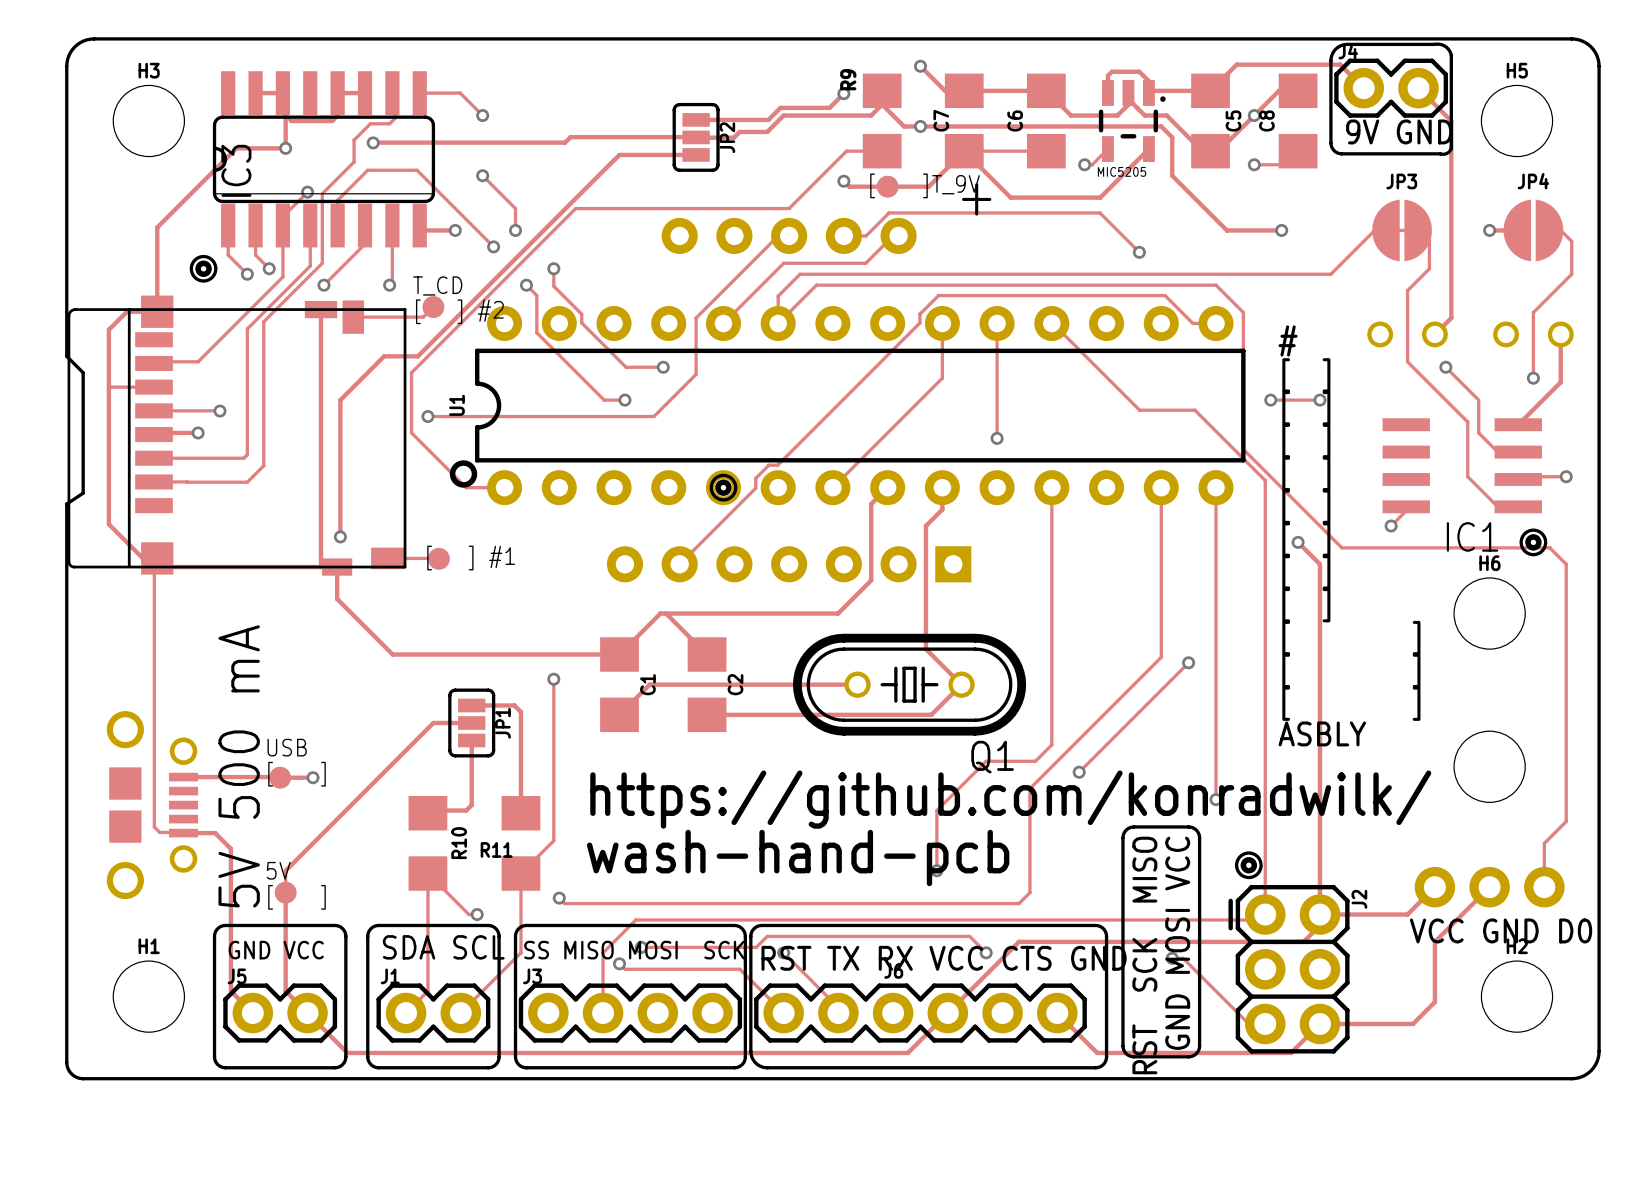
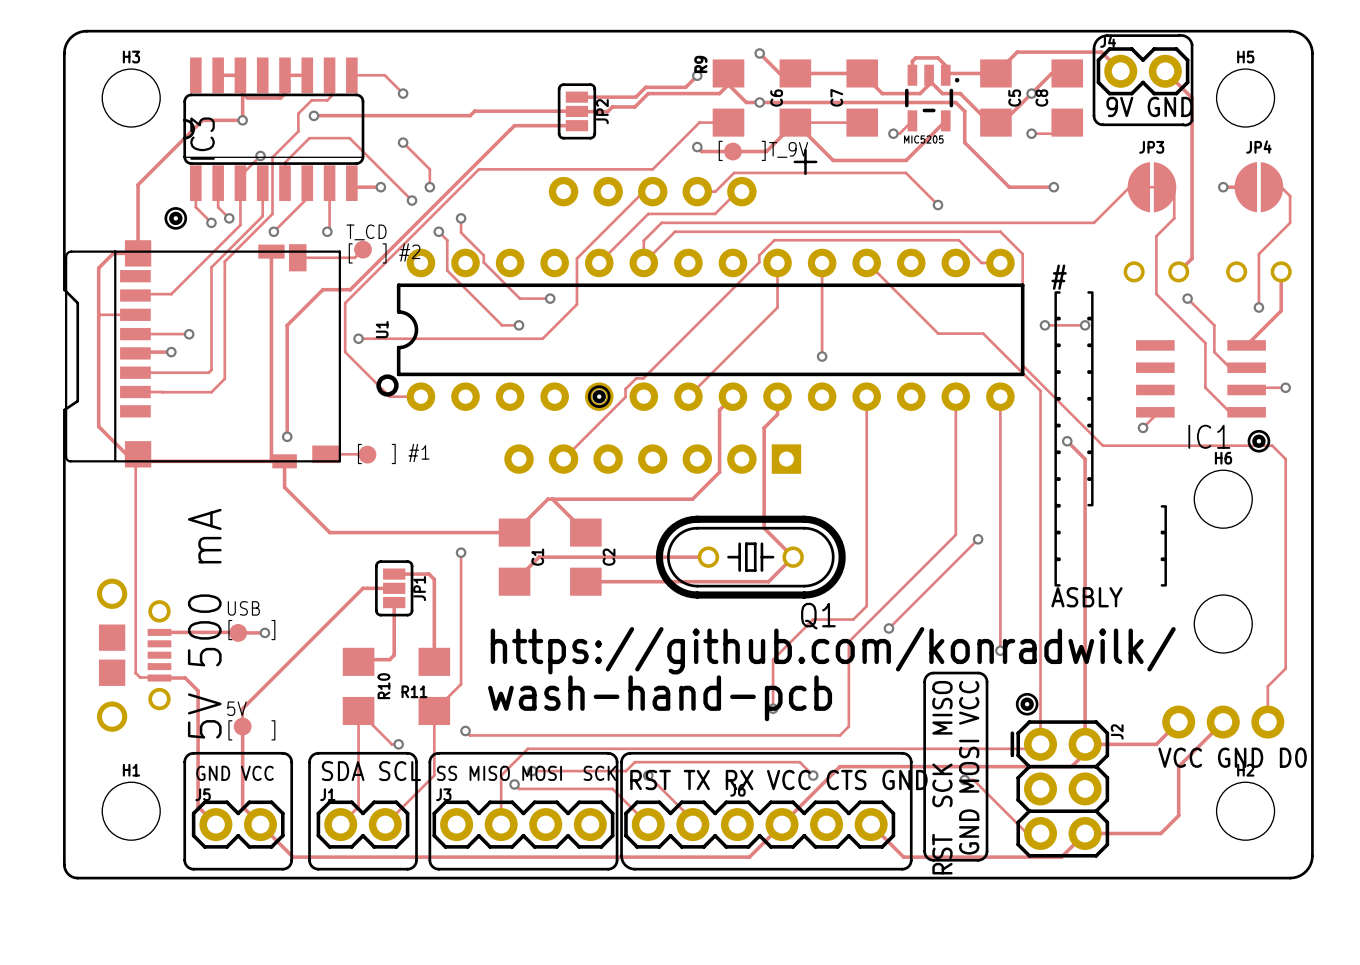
C7 name: C7 (941, 120) -> C6 (776, 98)
C6 name: C6 (1015, 121) -> C7 (836, 97)

